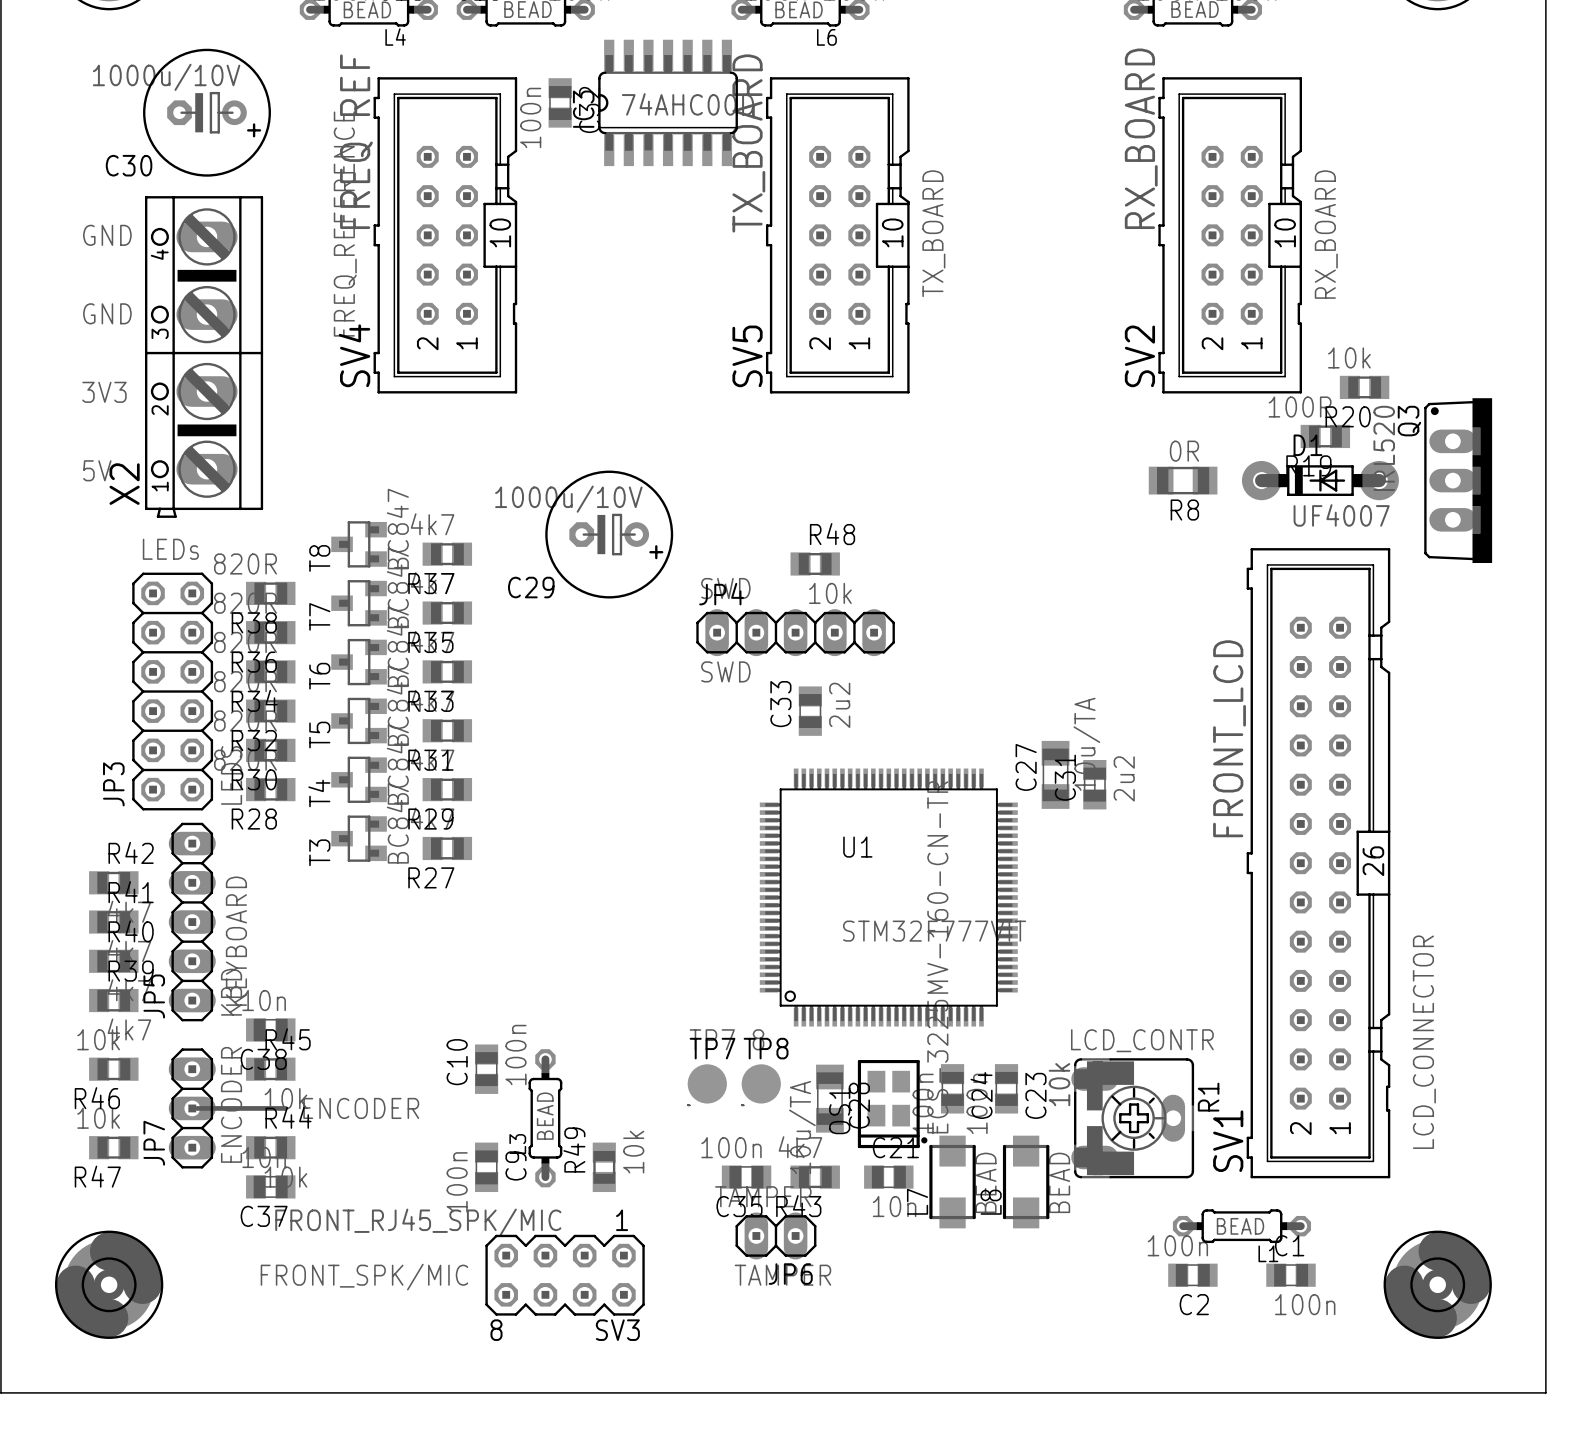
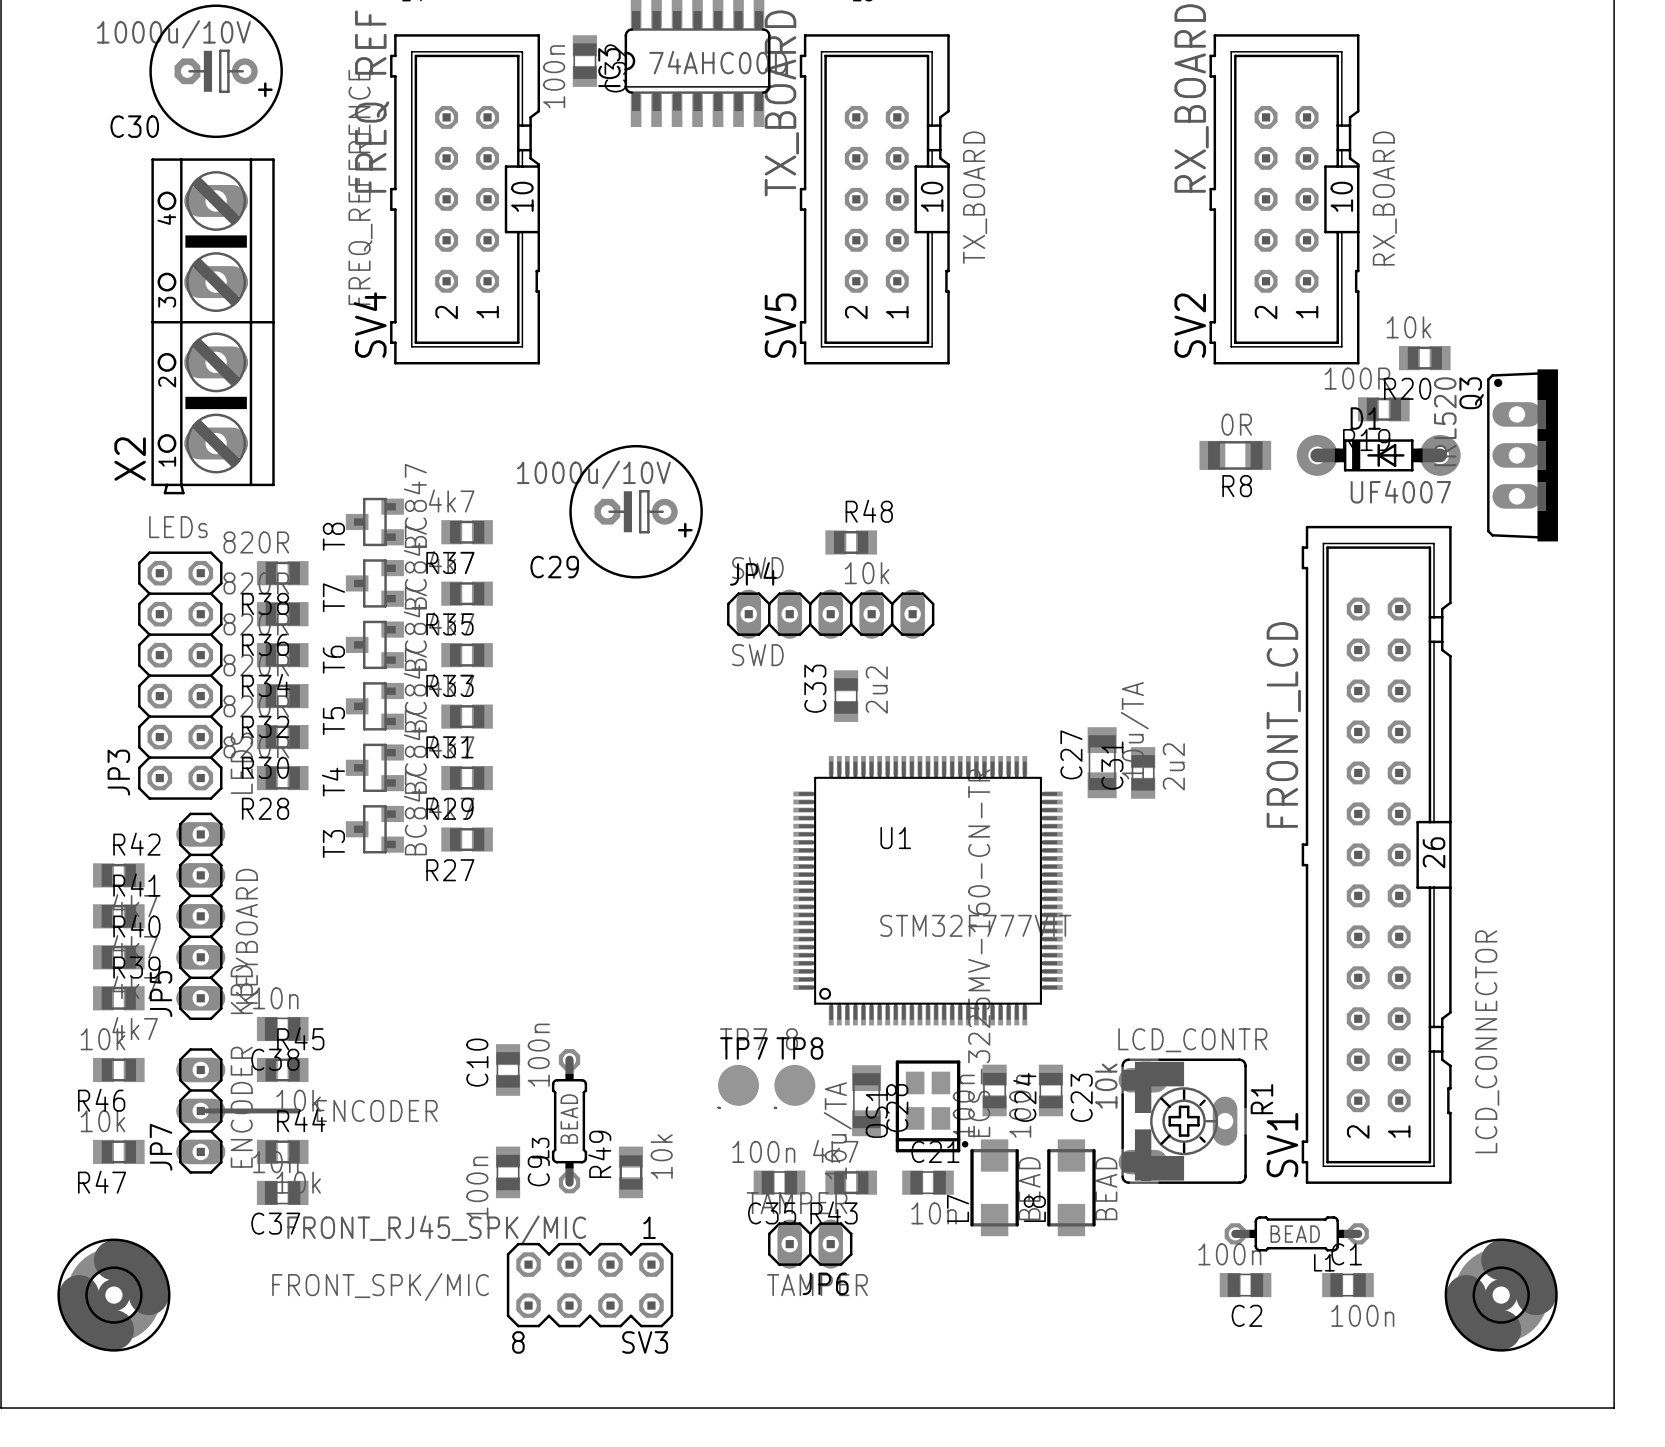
text: GND (107, 235) -> none
text: GND (107, 313) -> none
text: 3V3 (104, 392) -> none
text: 5V (97, 470) -> none

